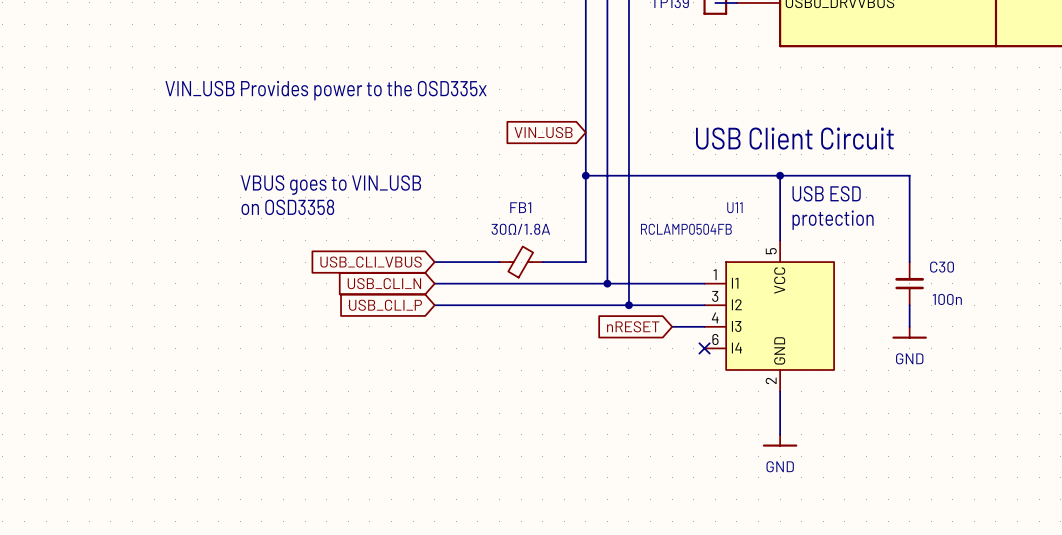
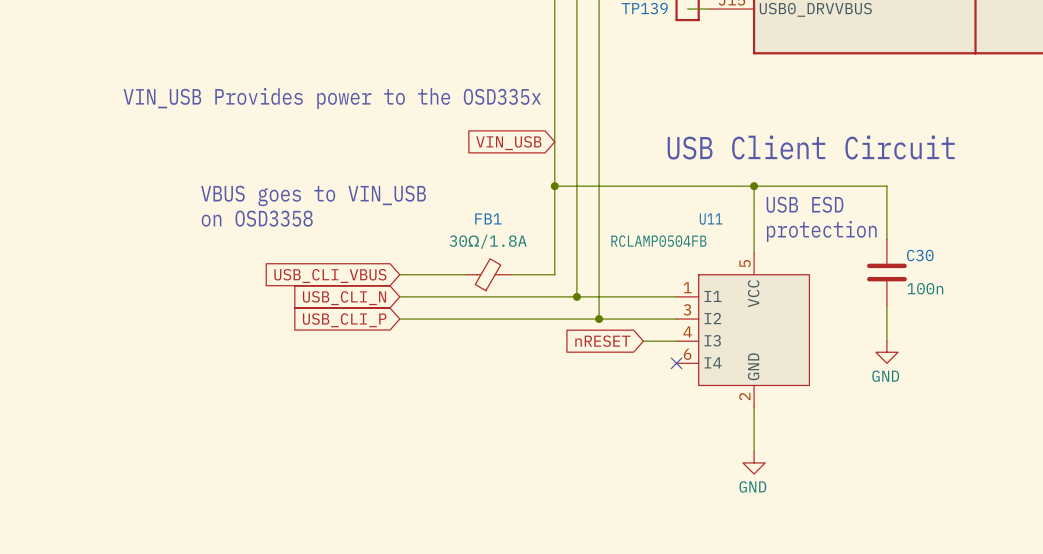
C30 symbol: [895, 262, 925, 306] -> [867, 239, 907, 306]
power symbol shape: [892, 326, 927, 339] -> [875, 341, 899, 364]
power symbol shape: [762, 434, 798, 447] -> [743, 451, 766, 475]

